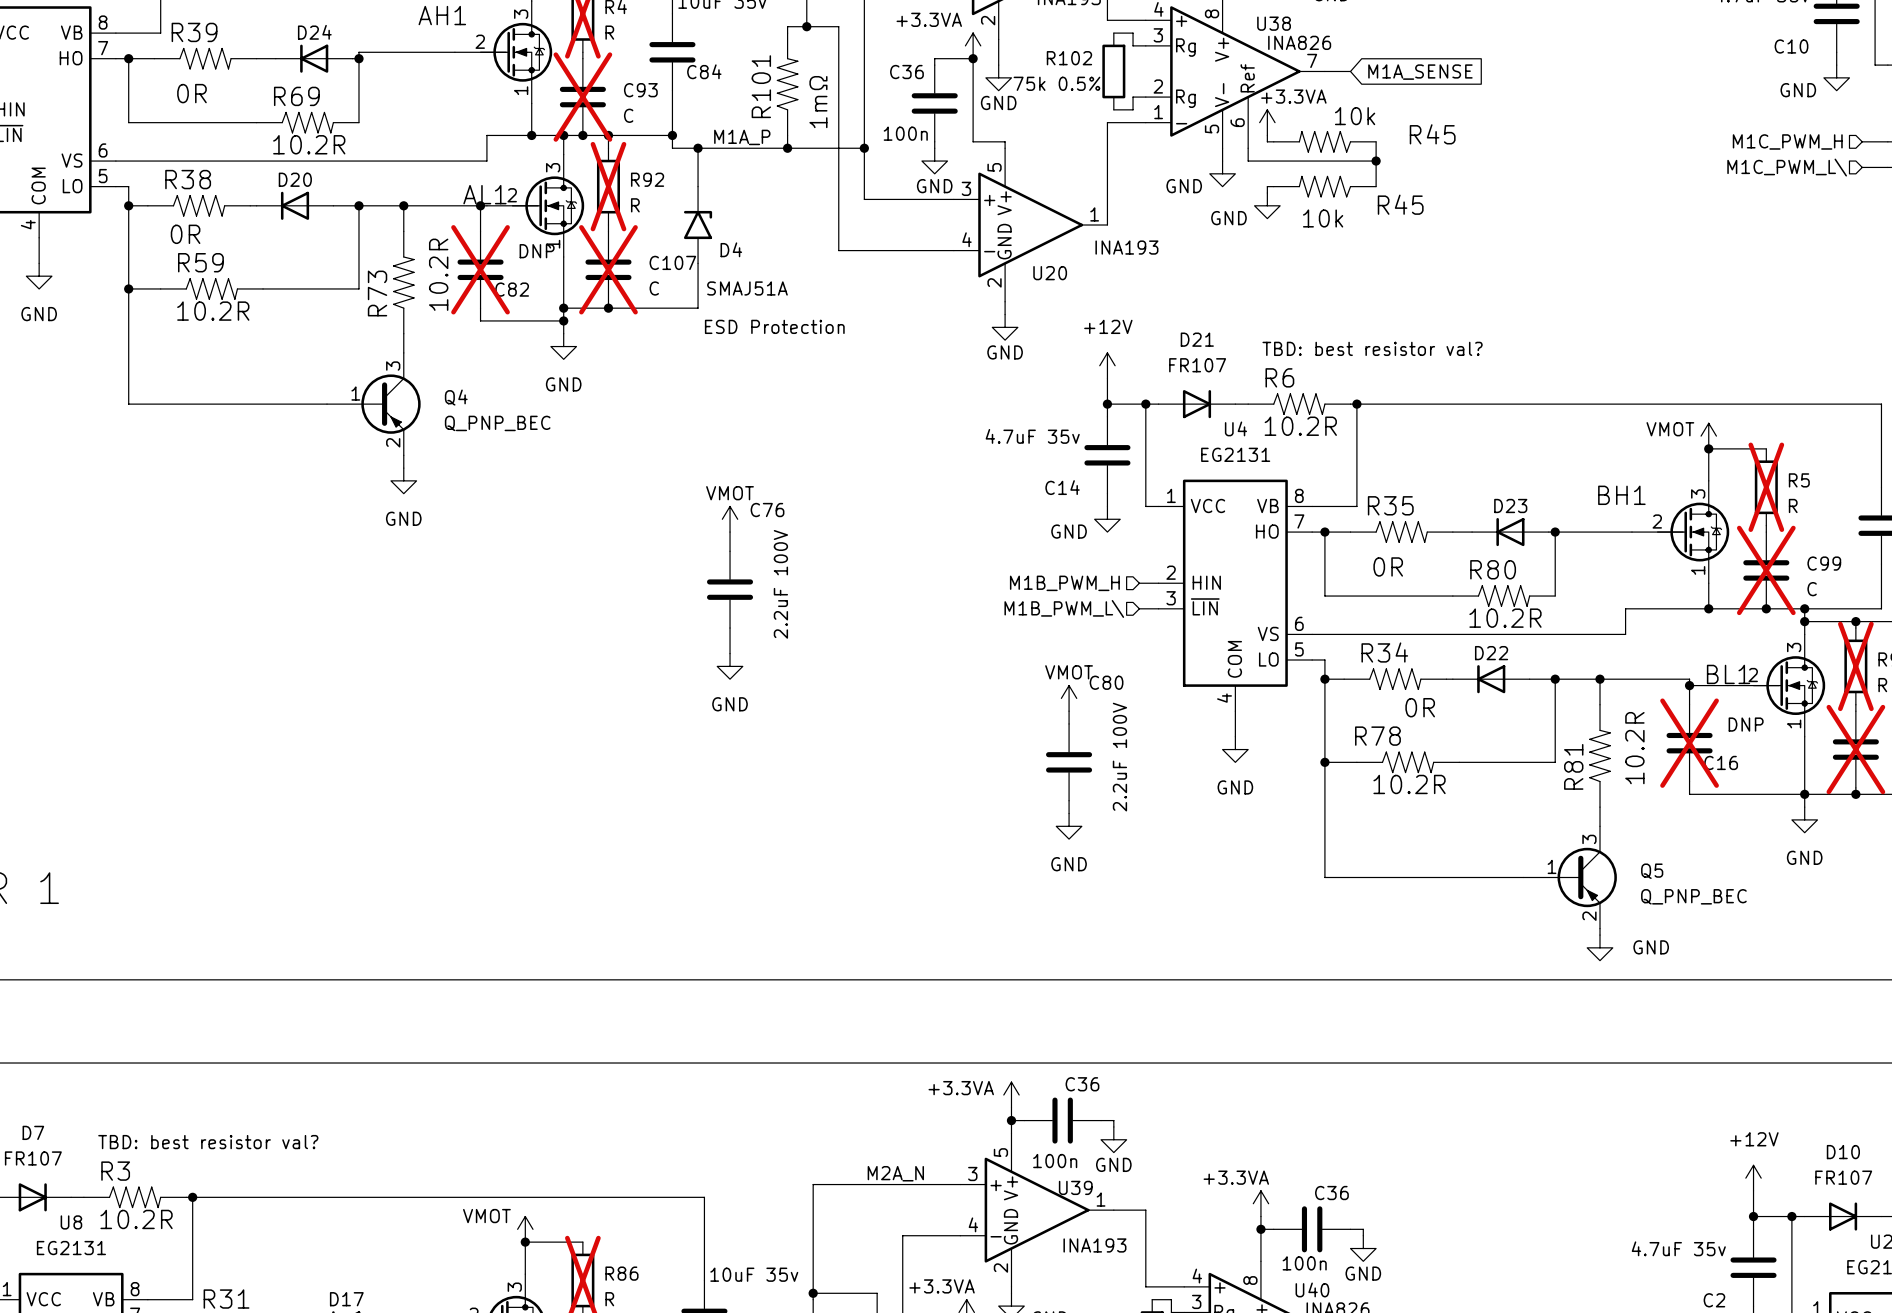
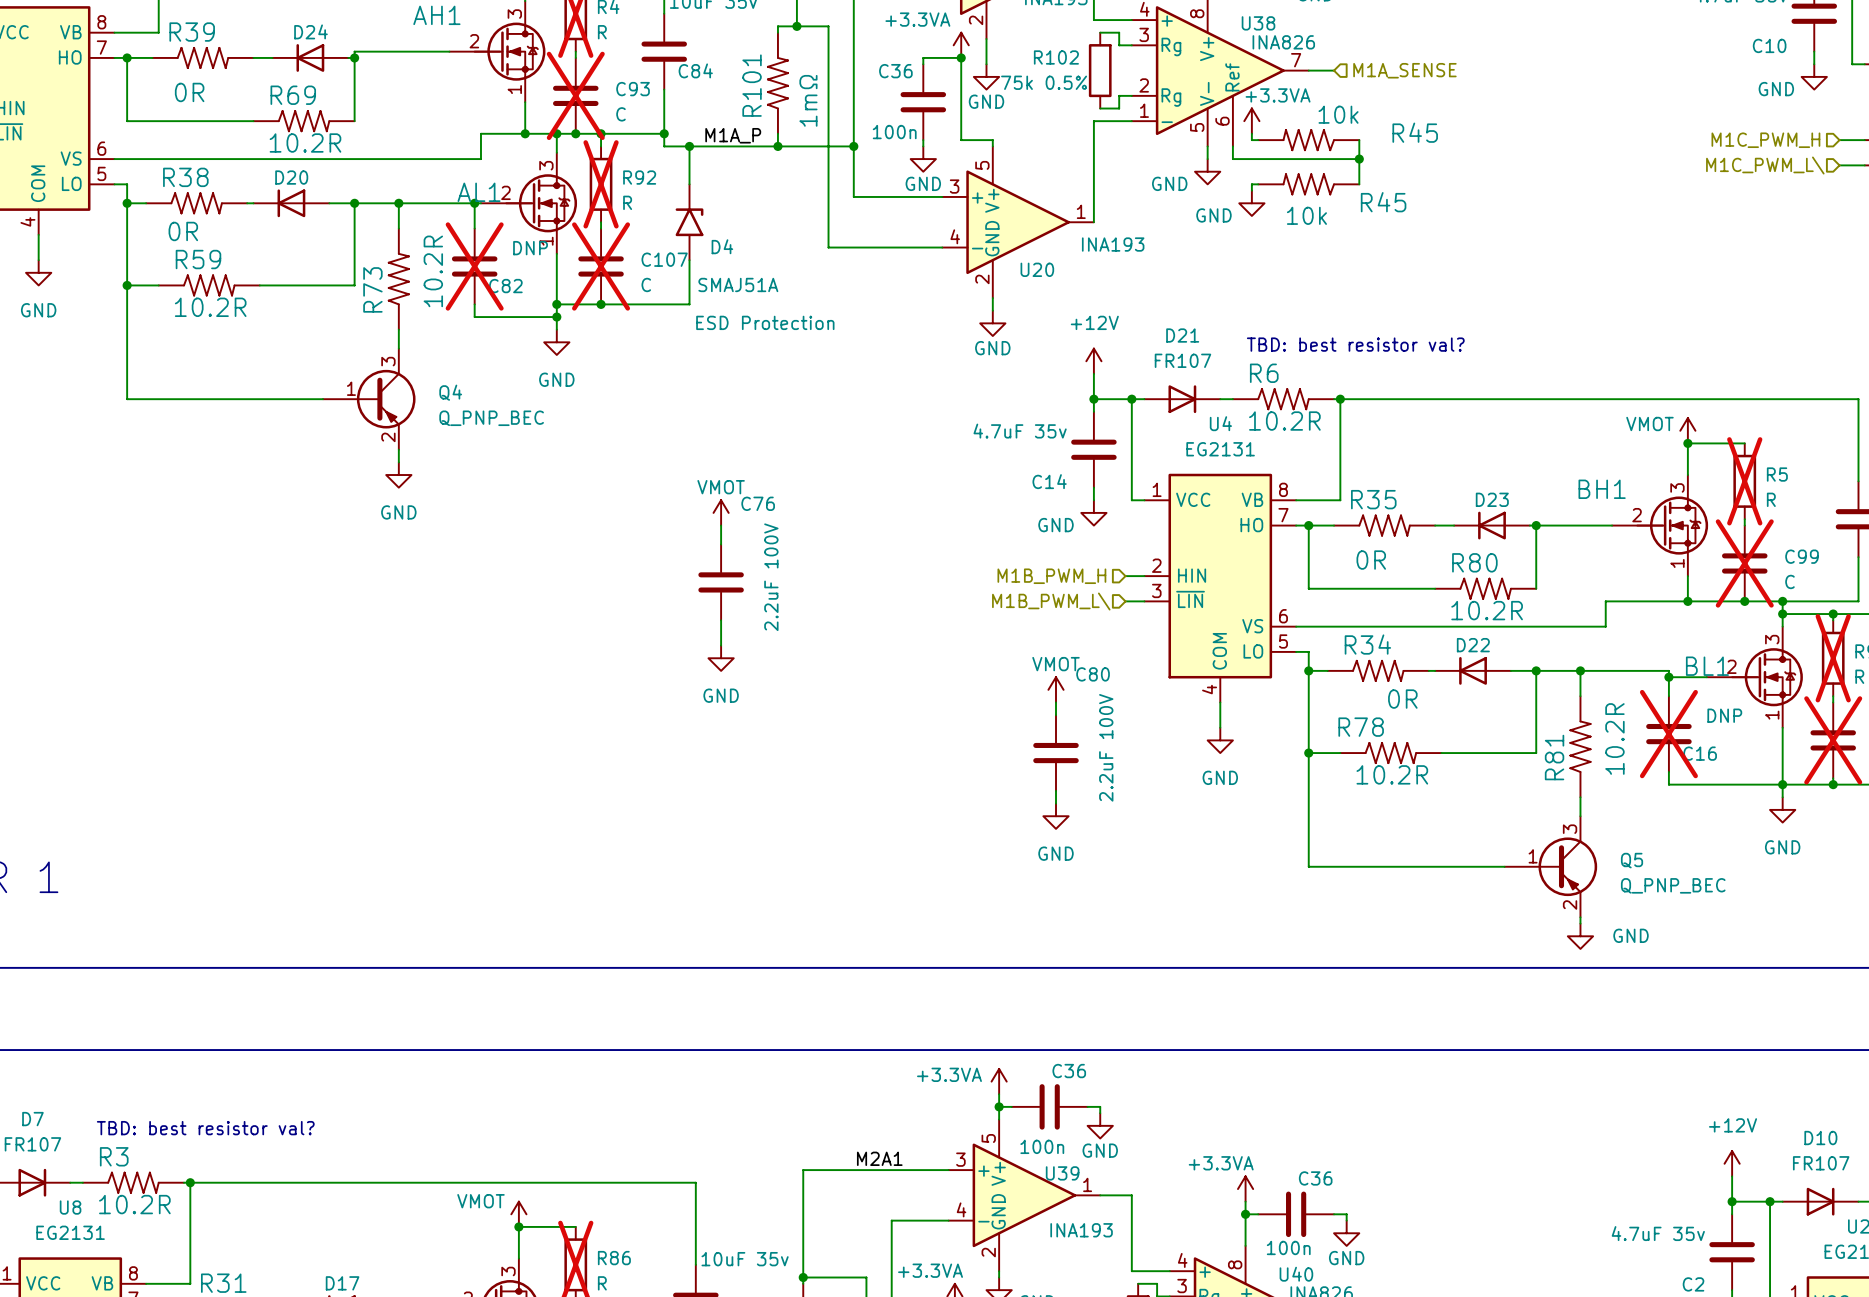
hierarchical label: none -> M1A_SENSE (1404, 70)
global label: M1A_SENSE (1420, 72) -> none
label: M2A_N (895, 1173) -> M2A1 (879, 1158)

